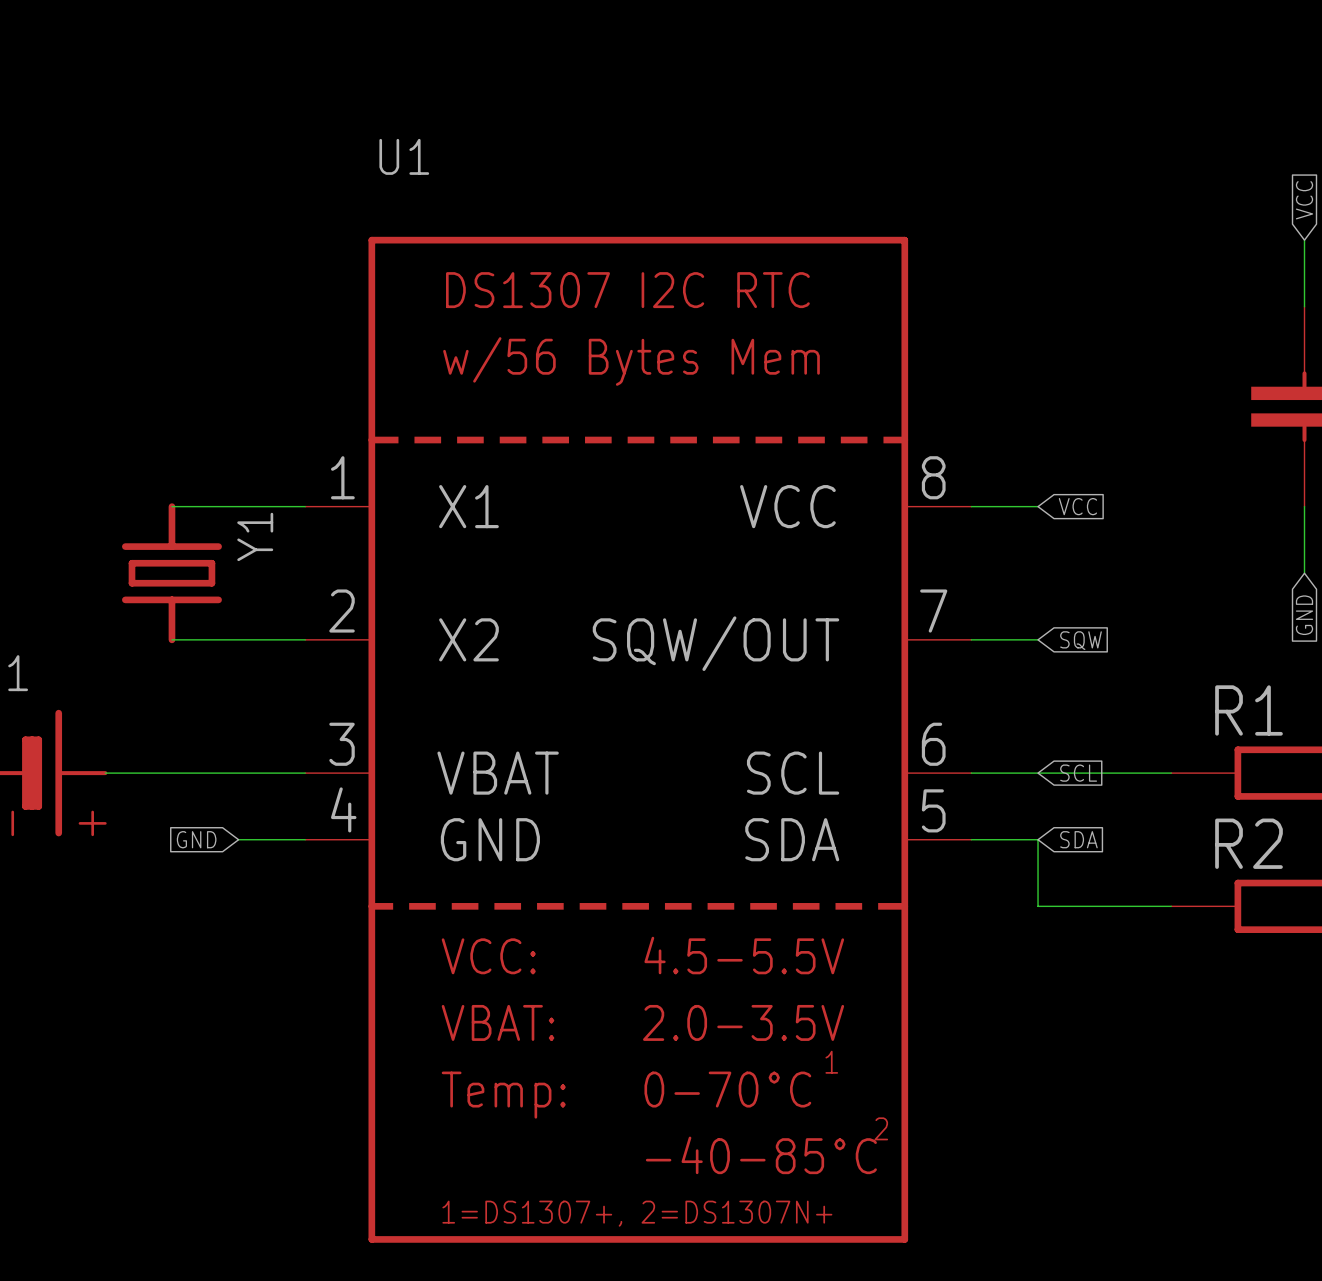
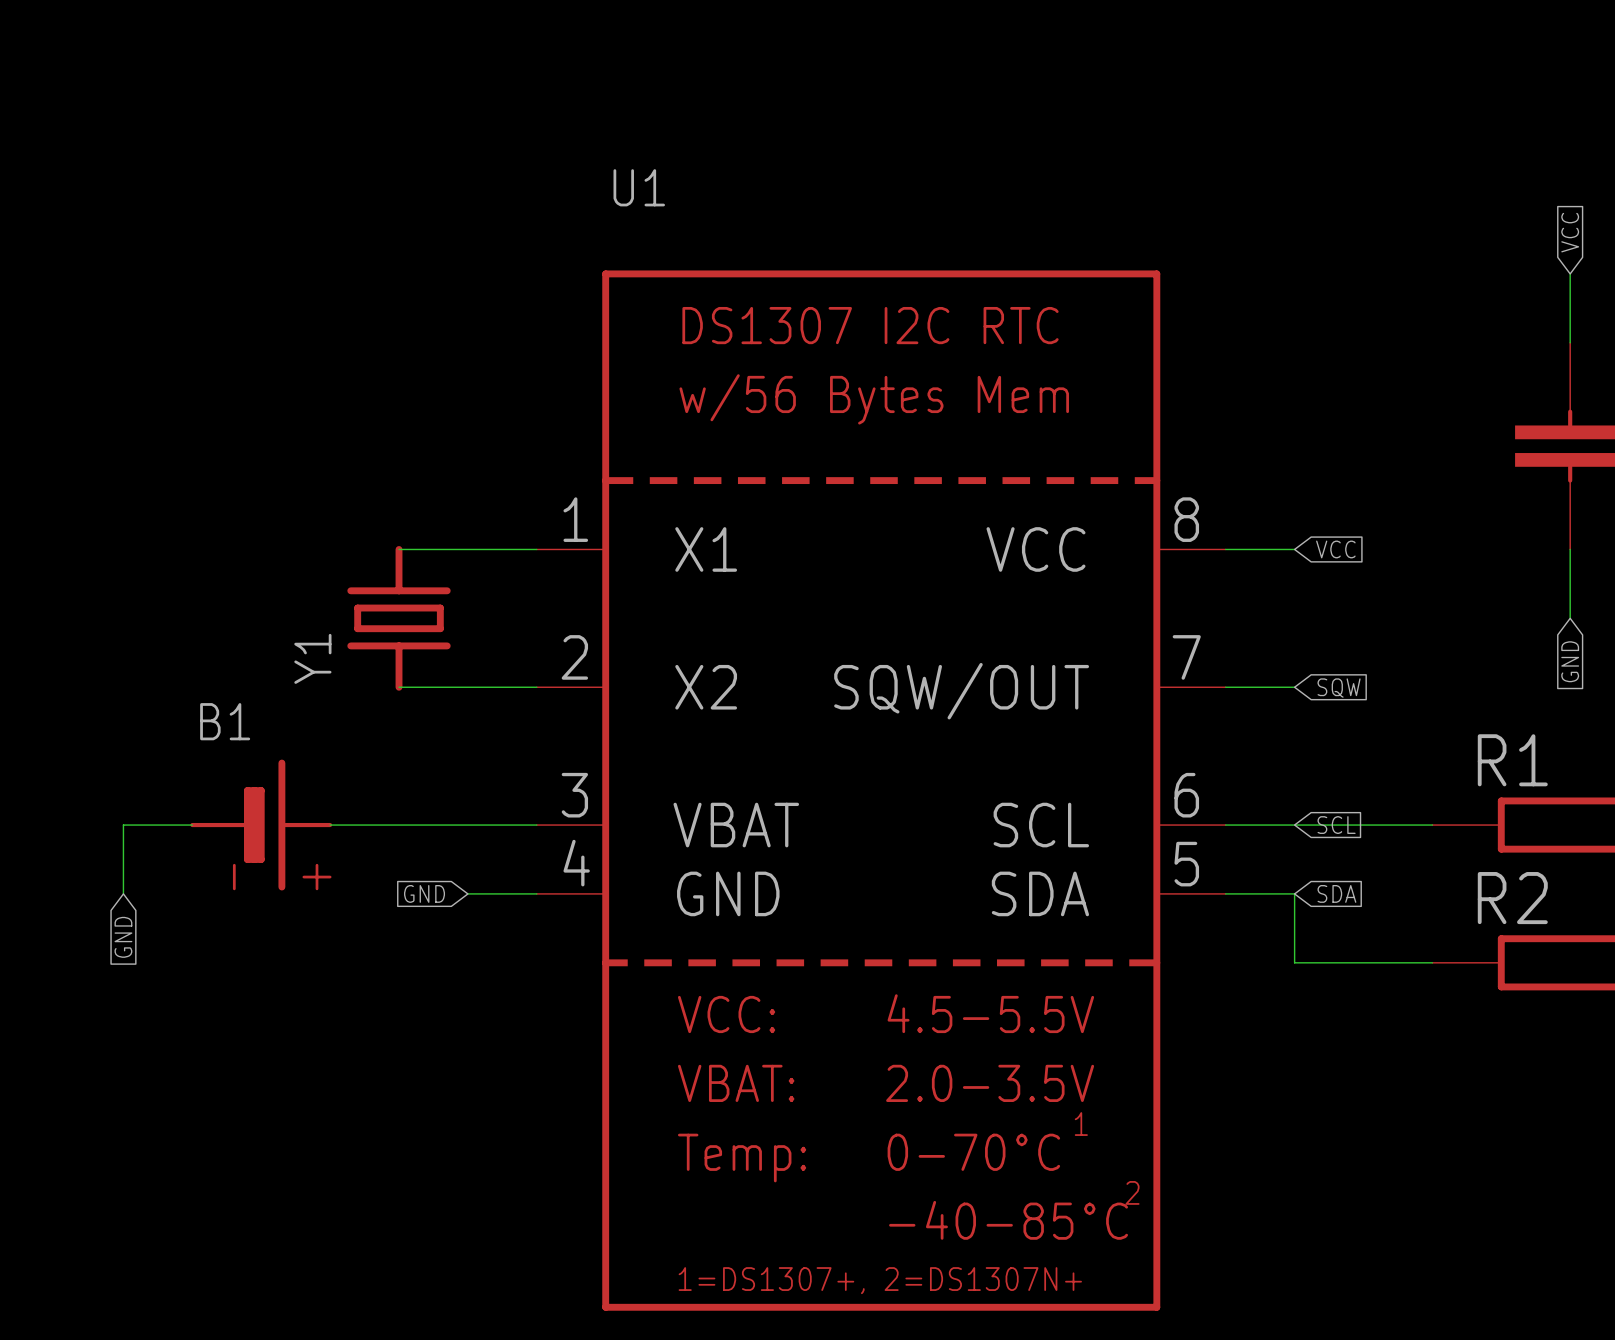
Y1 name position: Y1 (255, 536) -> Y1 (312, 658)

